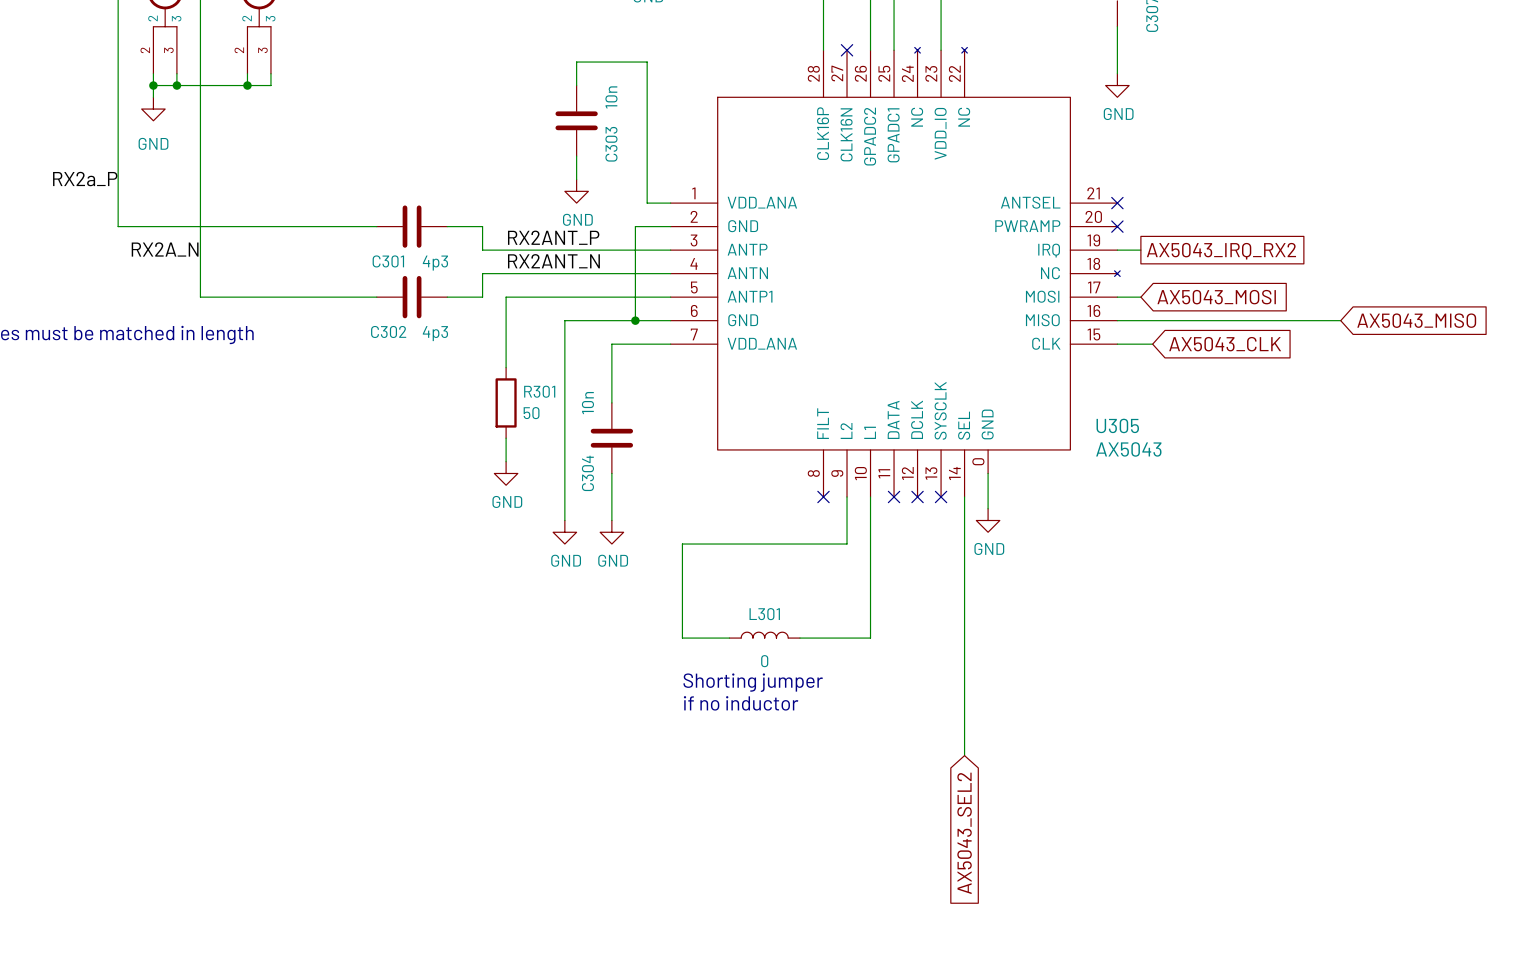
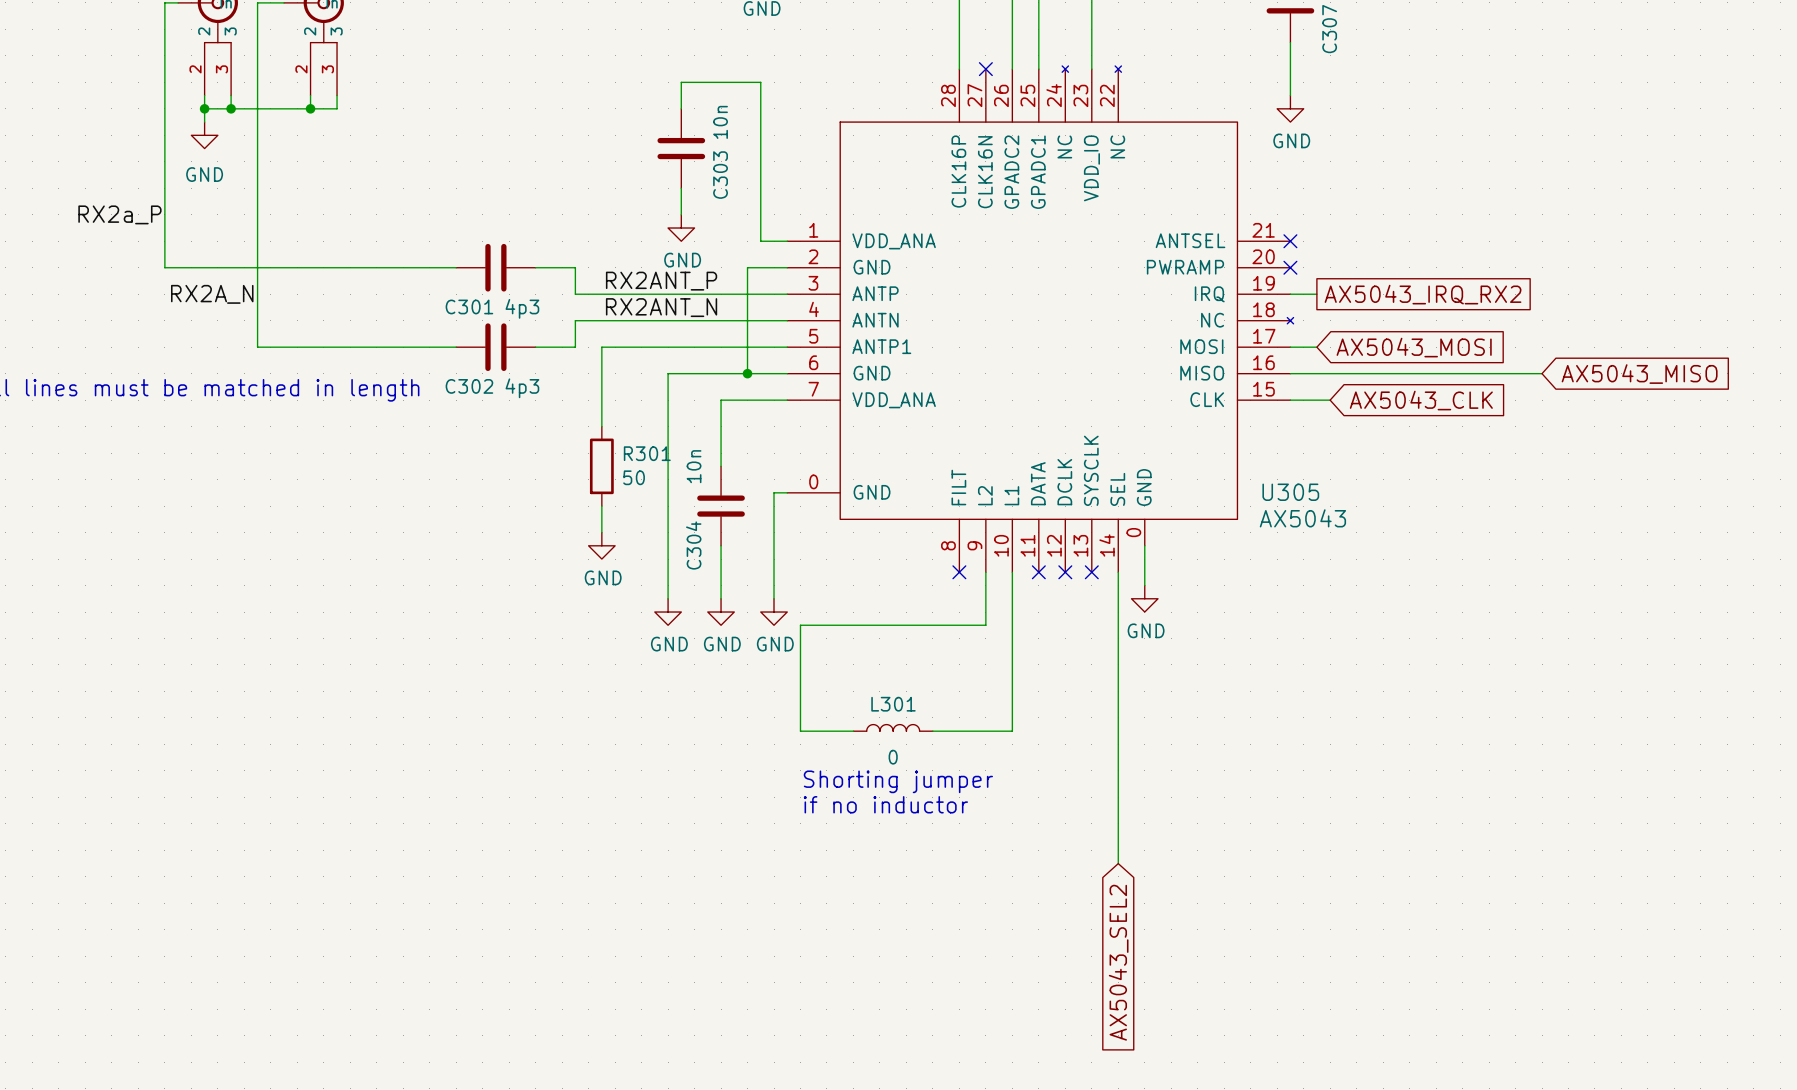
U305 symbol: [670, 47, 1121, 497] -> [787, 65, 1294, 573]
wire: none -> (787, 492) (774, 492) (774, 598)
power symbol: none -> GND (774, 612)

